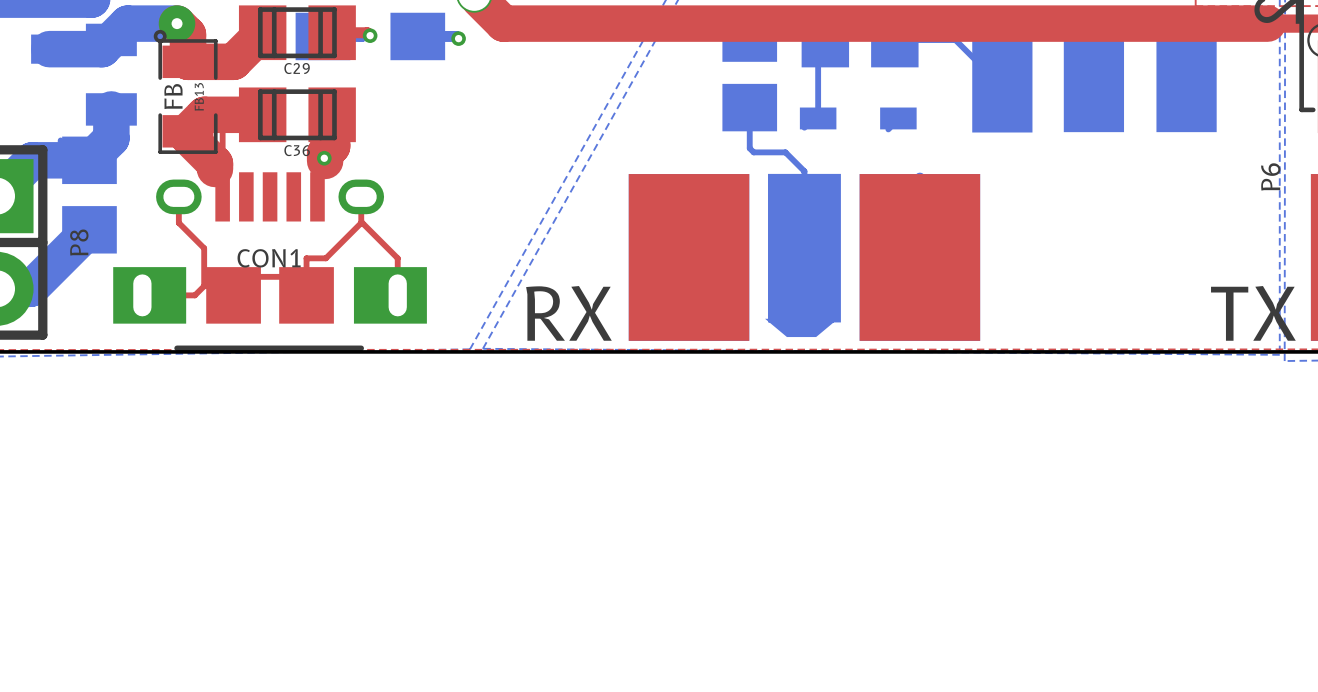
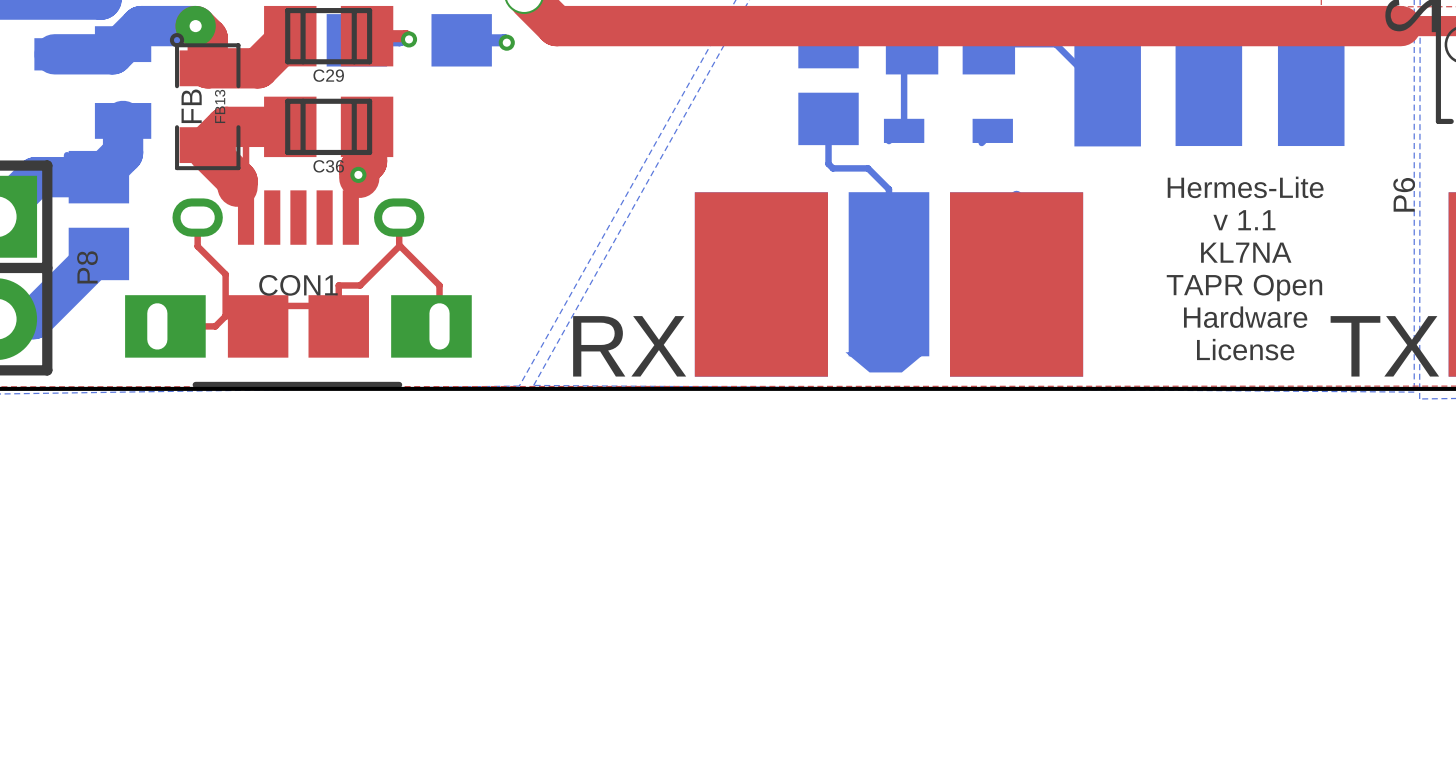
text: none -> Hermes-Lite (1245, 187)
text: none -> v 1.1 (1244, 220)
text: none -> KL7NA (1246, 252)
text: none -> TAPR Open (1244, 288)
text: none -> Hardware (1245, 317)
text: none -> License (1245, 349)

